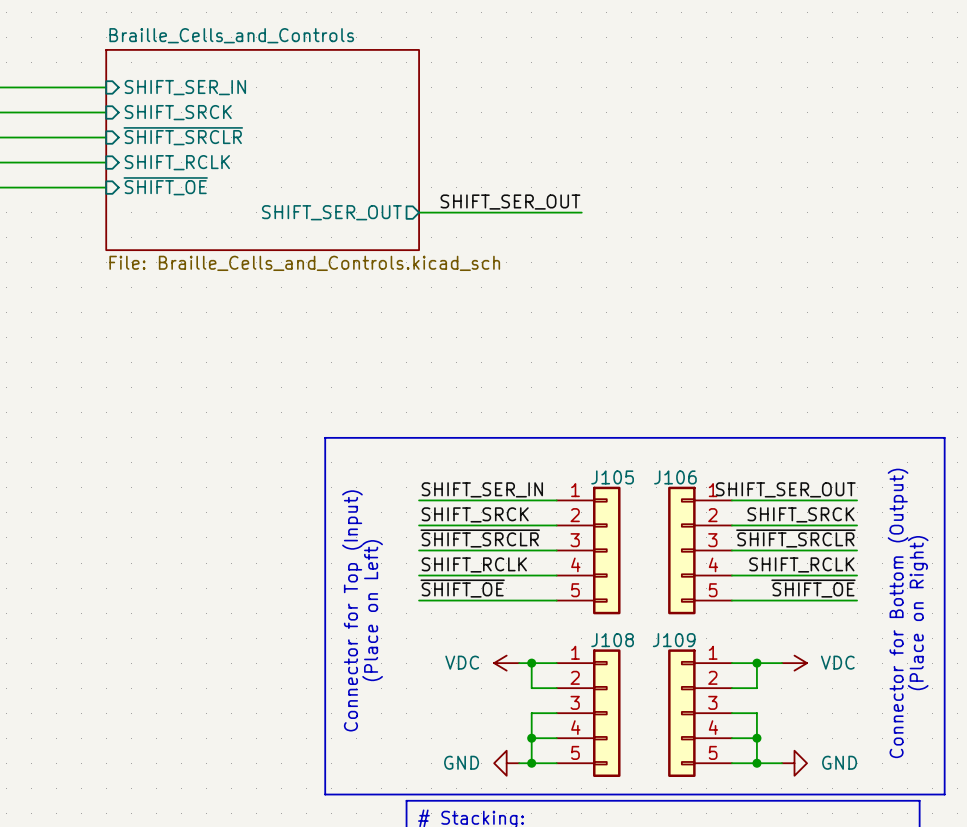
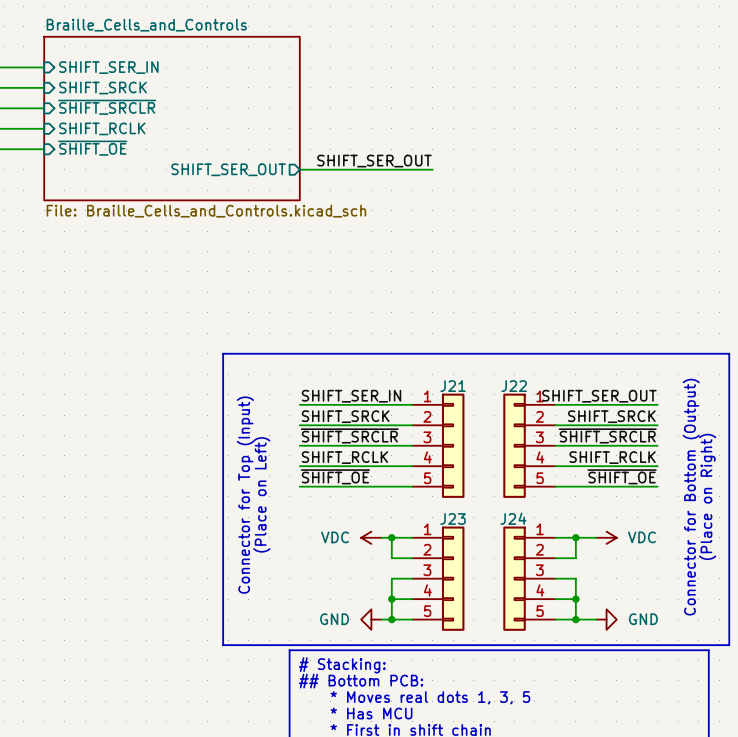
J105 name: J105 (612, 477) -> J21 (453, 386)
J106 name: J106 (675, 477) -> J22 (514, 386)
J108 name: J108 (612, 640) -> J23 (453, 518)
J109 name: J109 (674, 640) -> J24 (513, 518)

